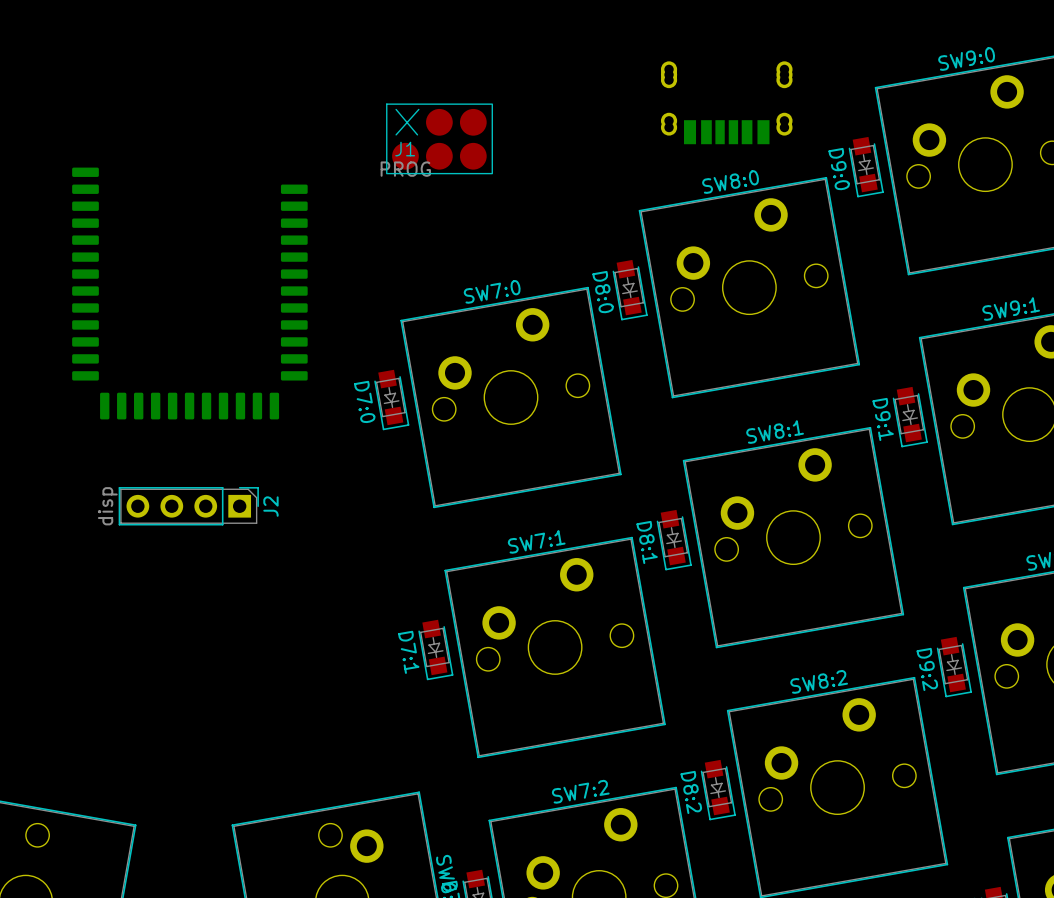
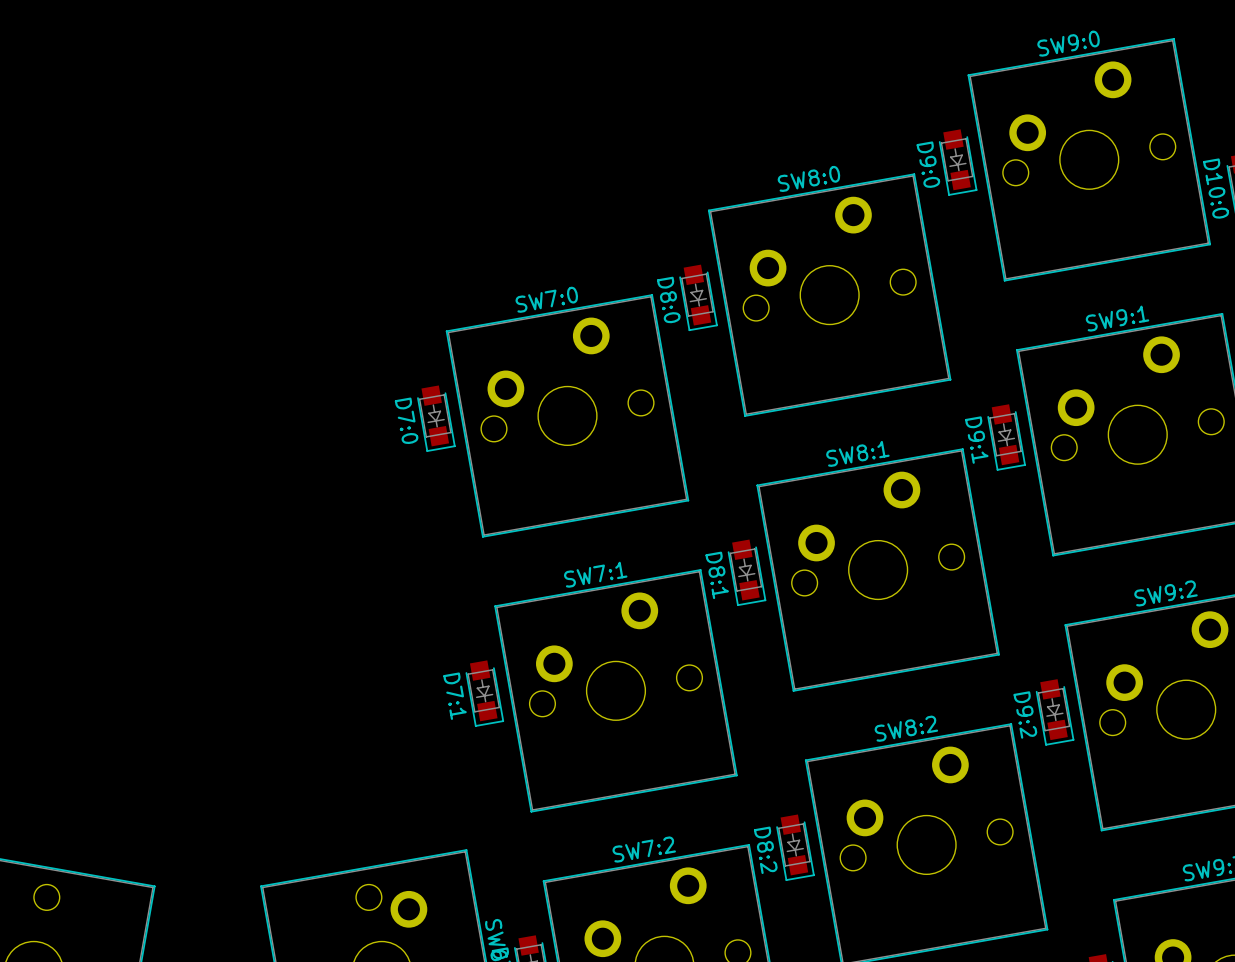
part: (726, 102) -> none
J1: PROG (439, 138) -> none
part: (189, 293) -> none
J2: disp (188, 506) -> none

